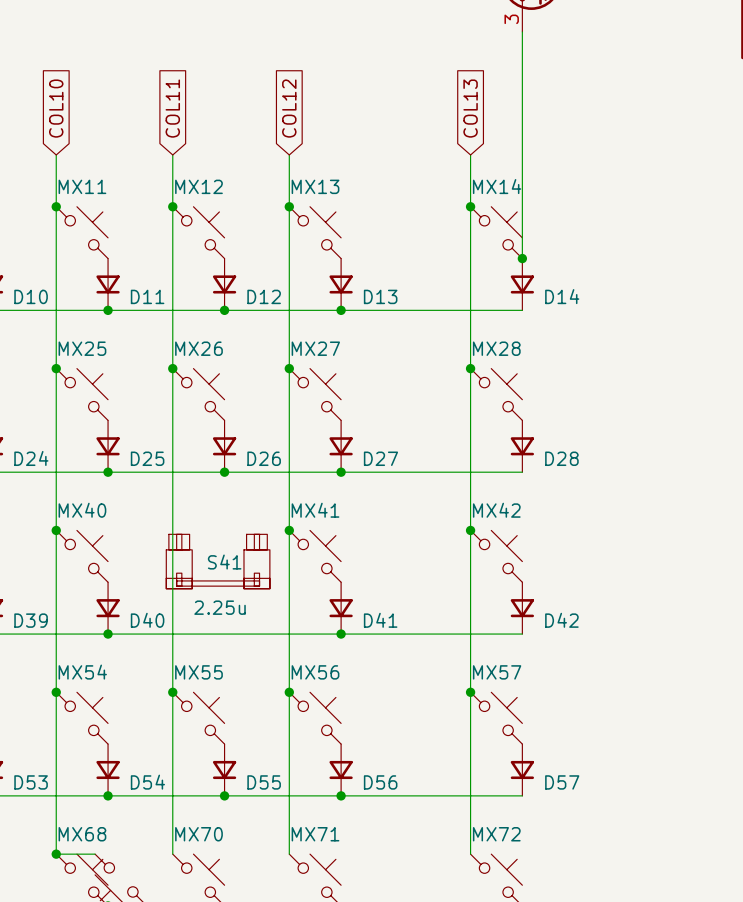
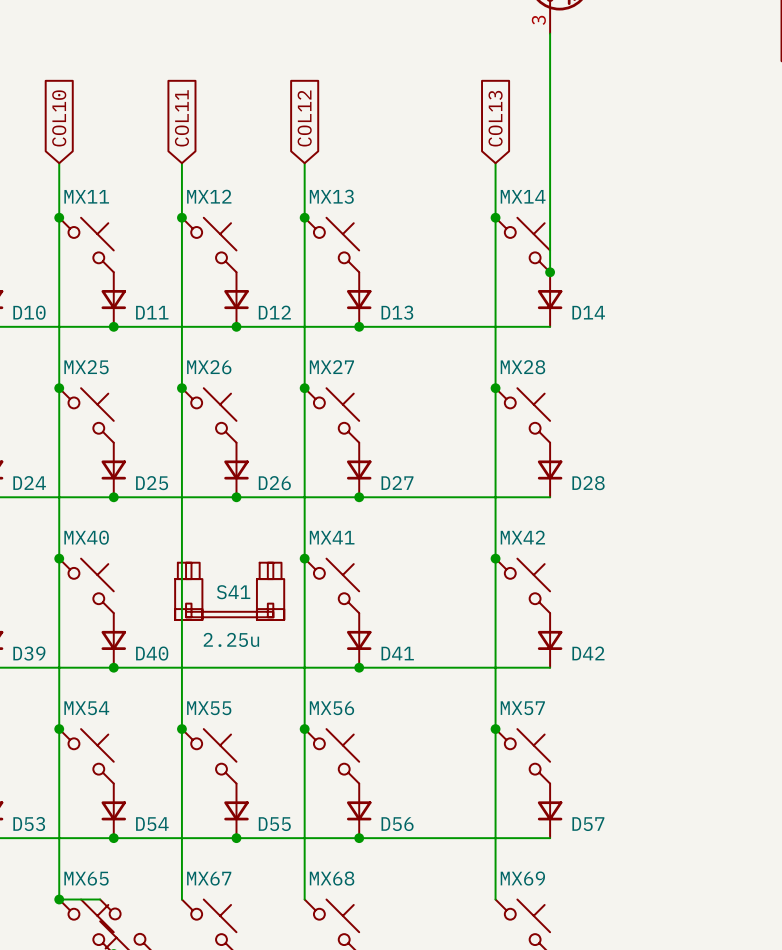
MX68 name: MX68 (82, 834) -> MX65 (86, 878)
MX70 name: MX70 (198, 834) -> MX67 (209, 878)
MX71 name: MX71 (315, 834) -> MX68 (332, 878)
MX72 name: MX72 (496, 834) -> MX69 (522, 878)

